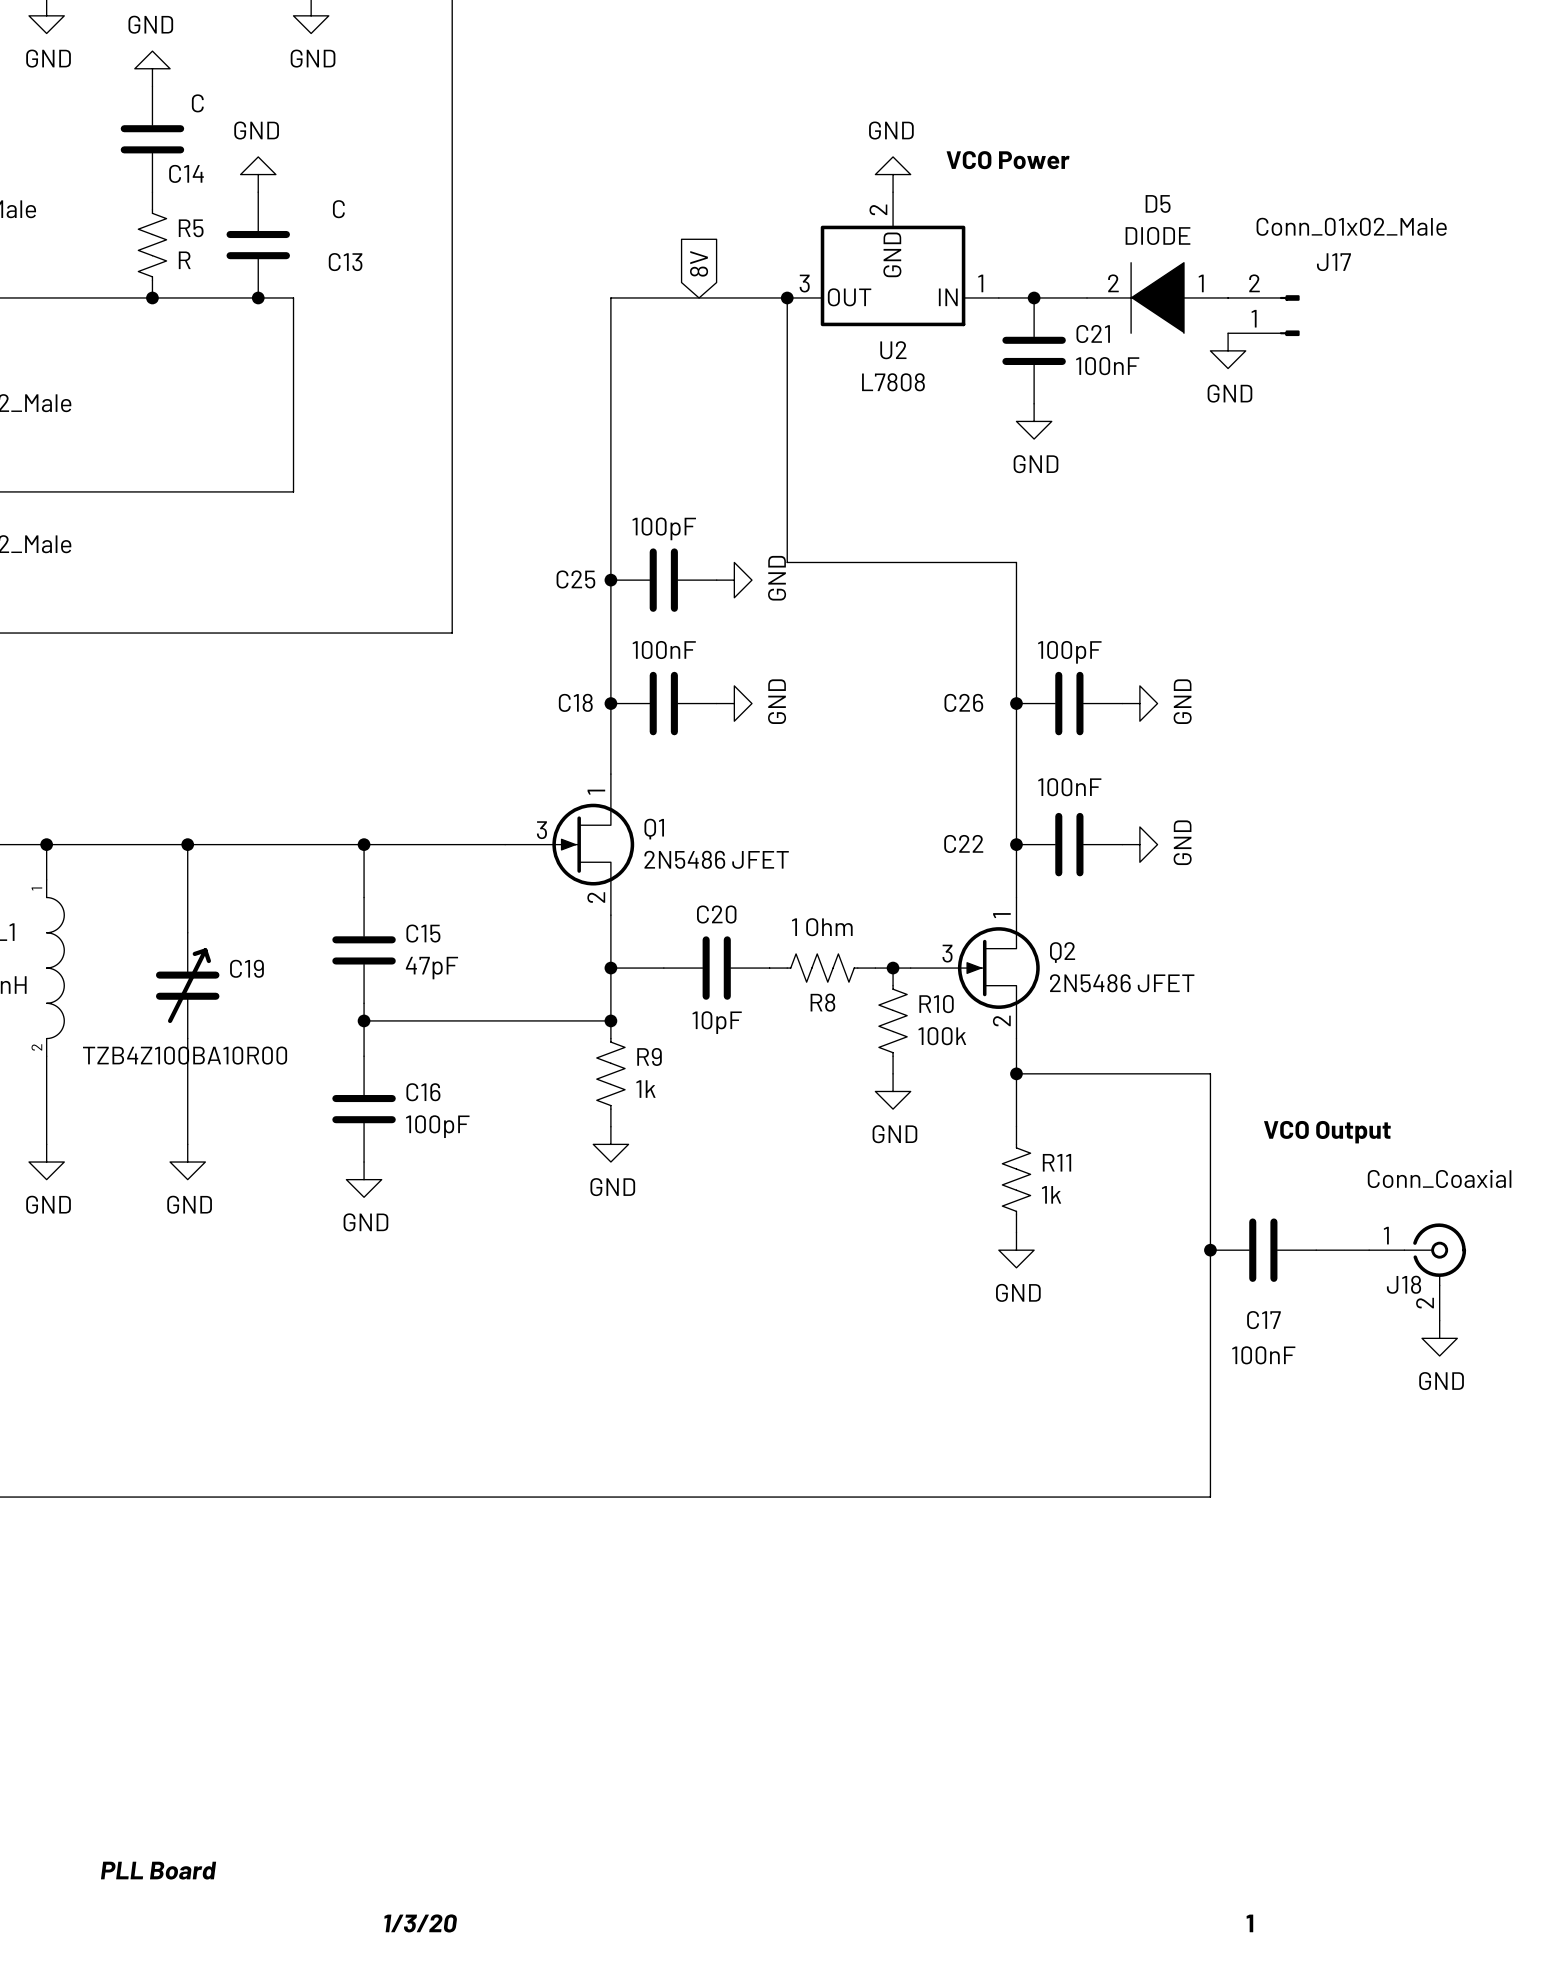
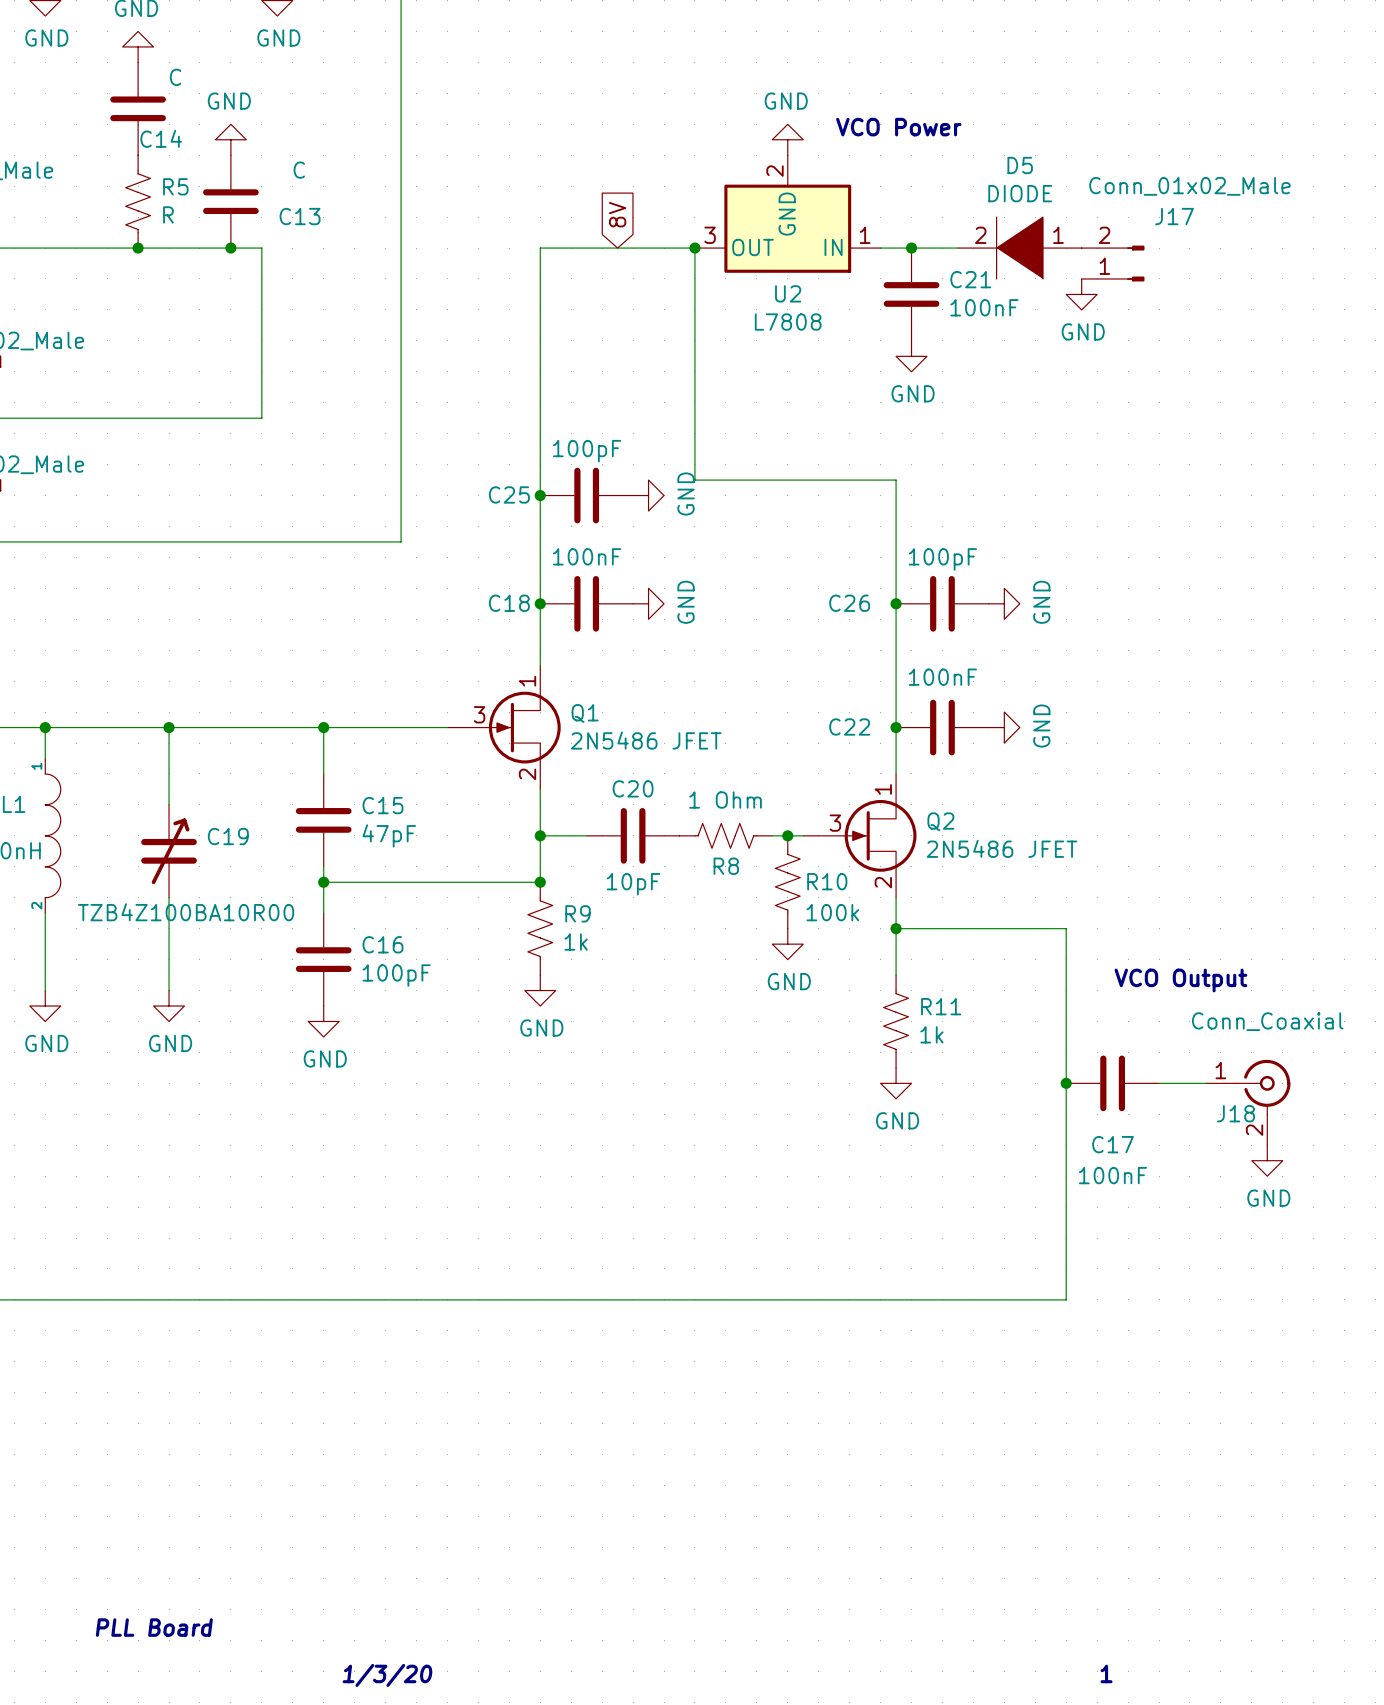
R10 name position: R10 (936, 1004) -> R10 (827, 881)
R10 value position: 100k (942, 1036) -> 100k (832, 912)

